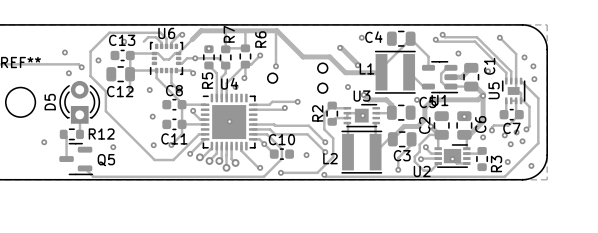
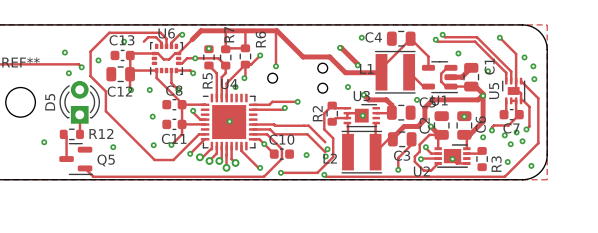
via: (325, 142) -> none
via: none -> (327, 149)
via: (325, 152) -> none
via: none -> (325, 156)

